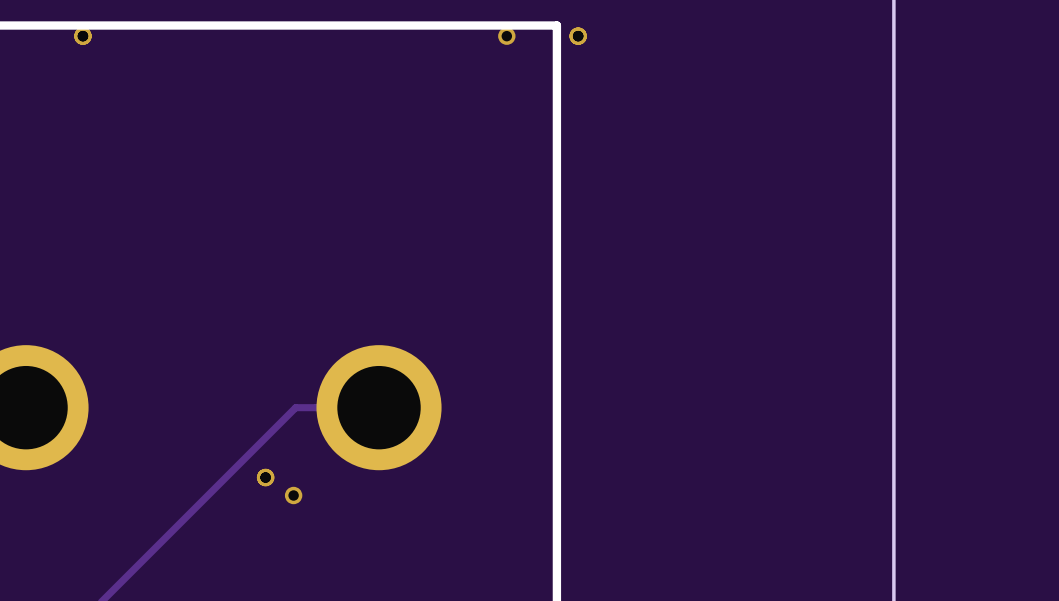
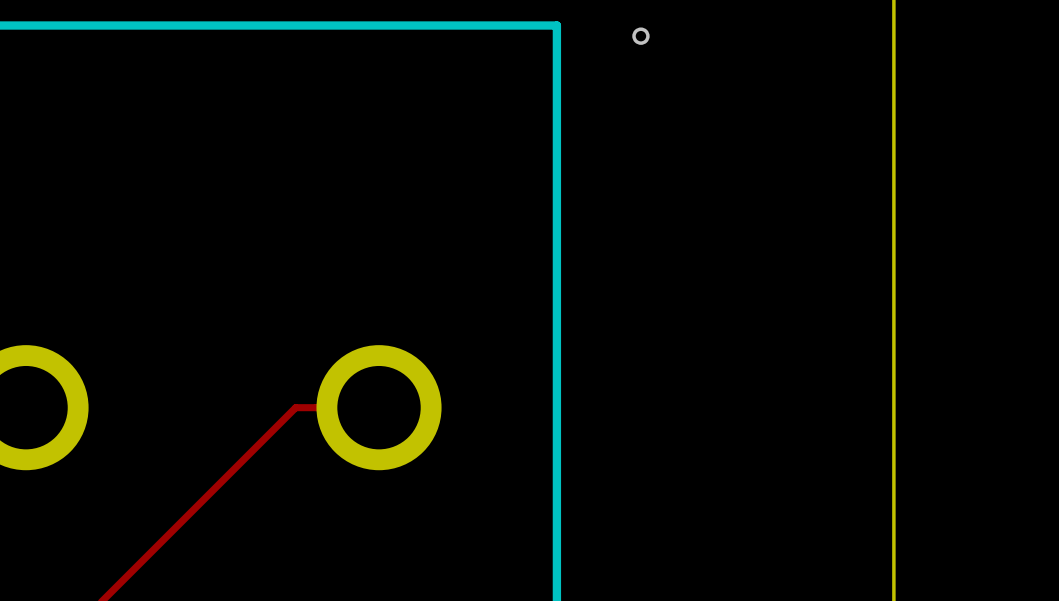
via: (82, 36) -> none
via: (506, 36) -> none
via position: (578, 36) -> (640, 36)
via: (265, 477) -> none
via: (293, 495) -> none

